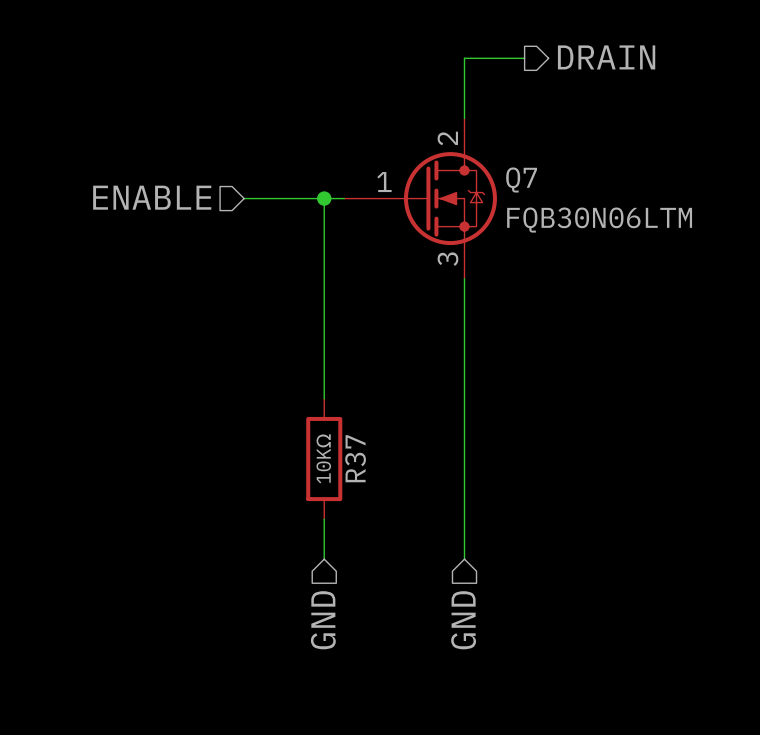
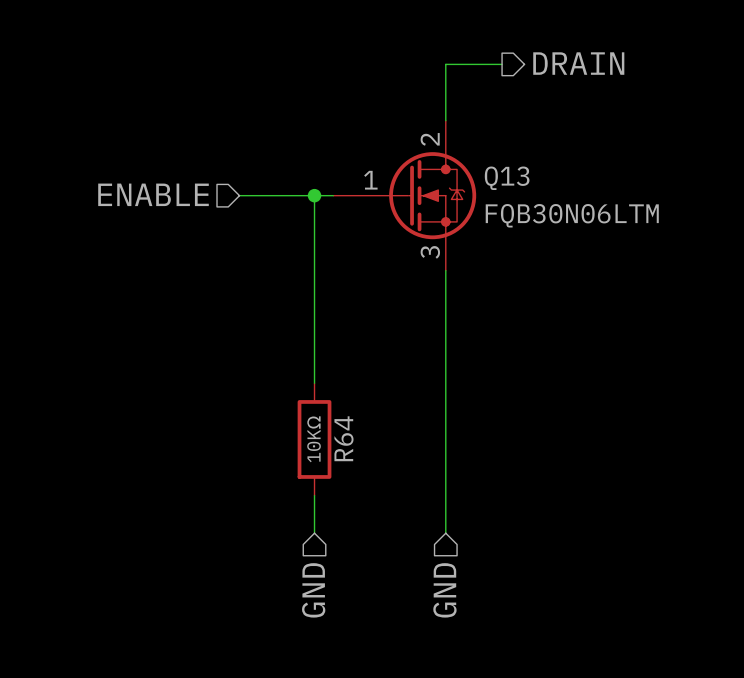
Q7 name: Q7 (521, 179) -> Q13 (507, 178)
R37 name: R37 (355, 458) -> R64 (343, 438)

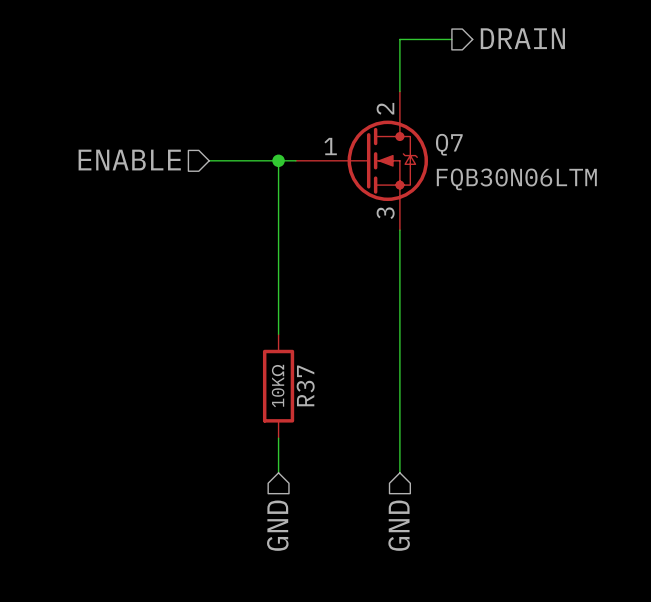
Q13 name: Q13 (507, 178) -> Q7 (449, 144)
R64 name: R64 (343, 438) -> R37 (305, 385)

